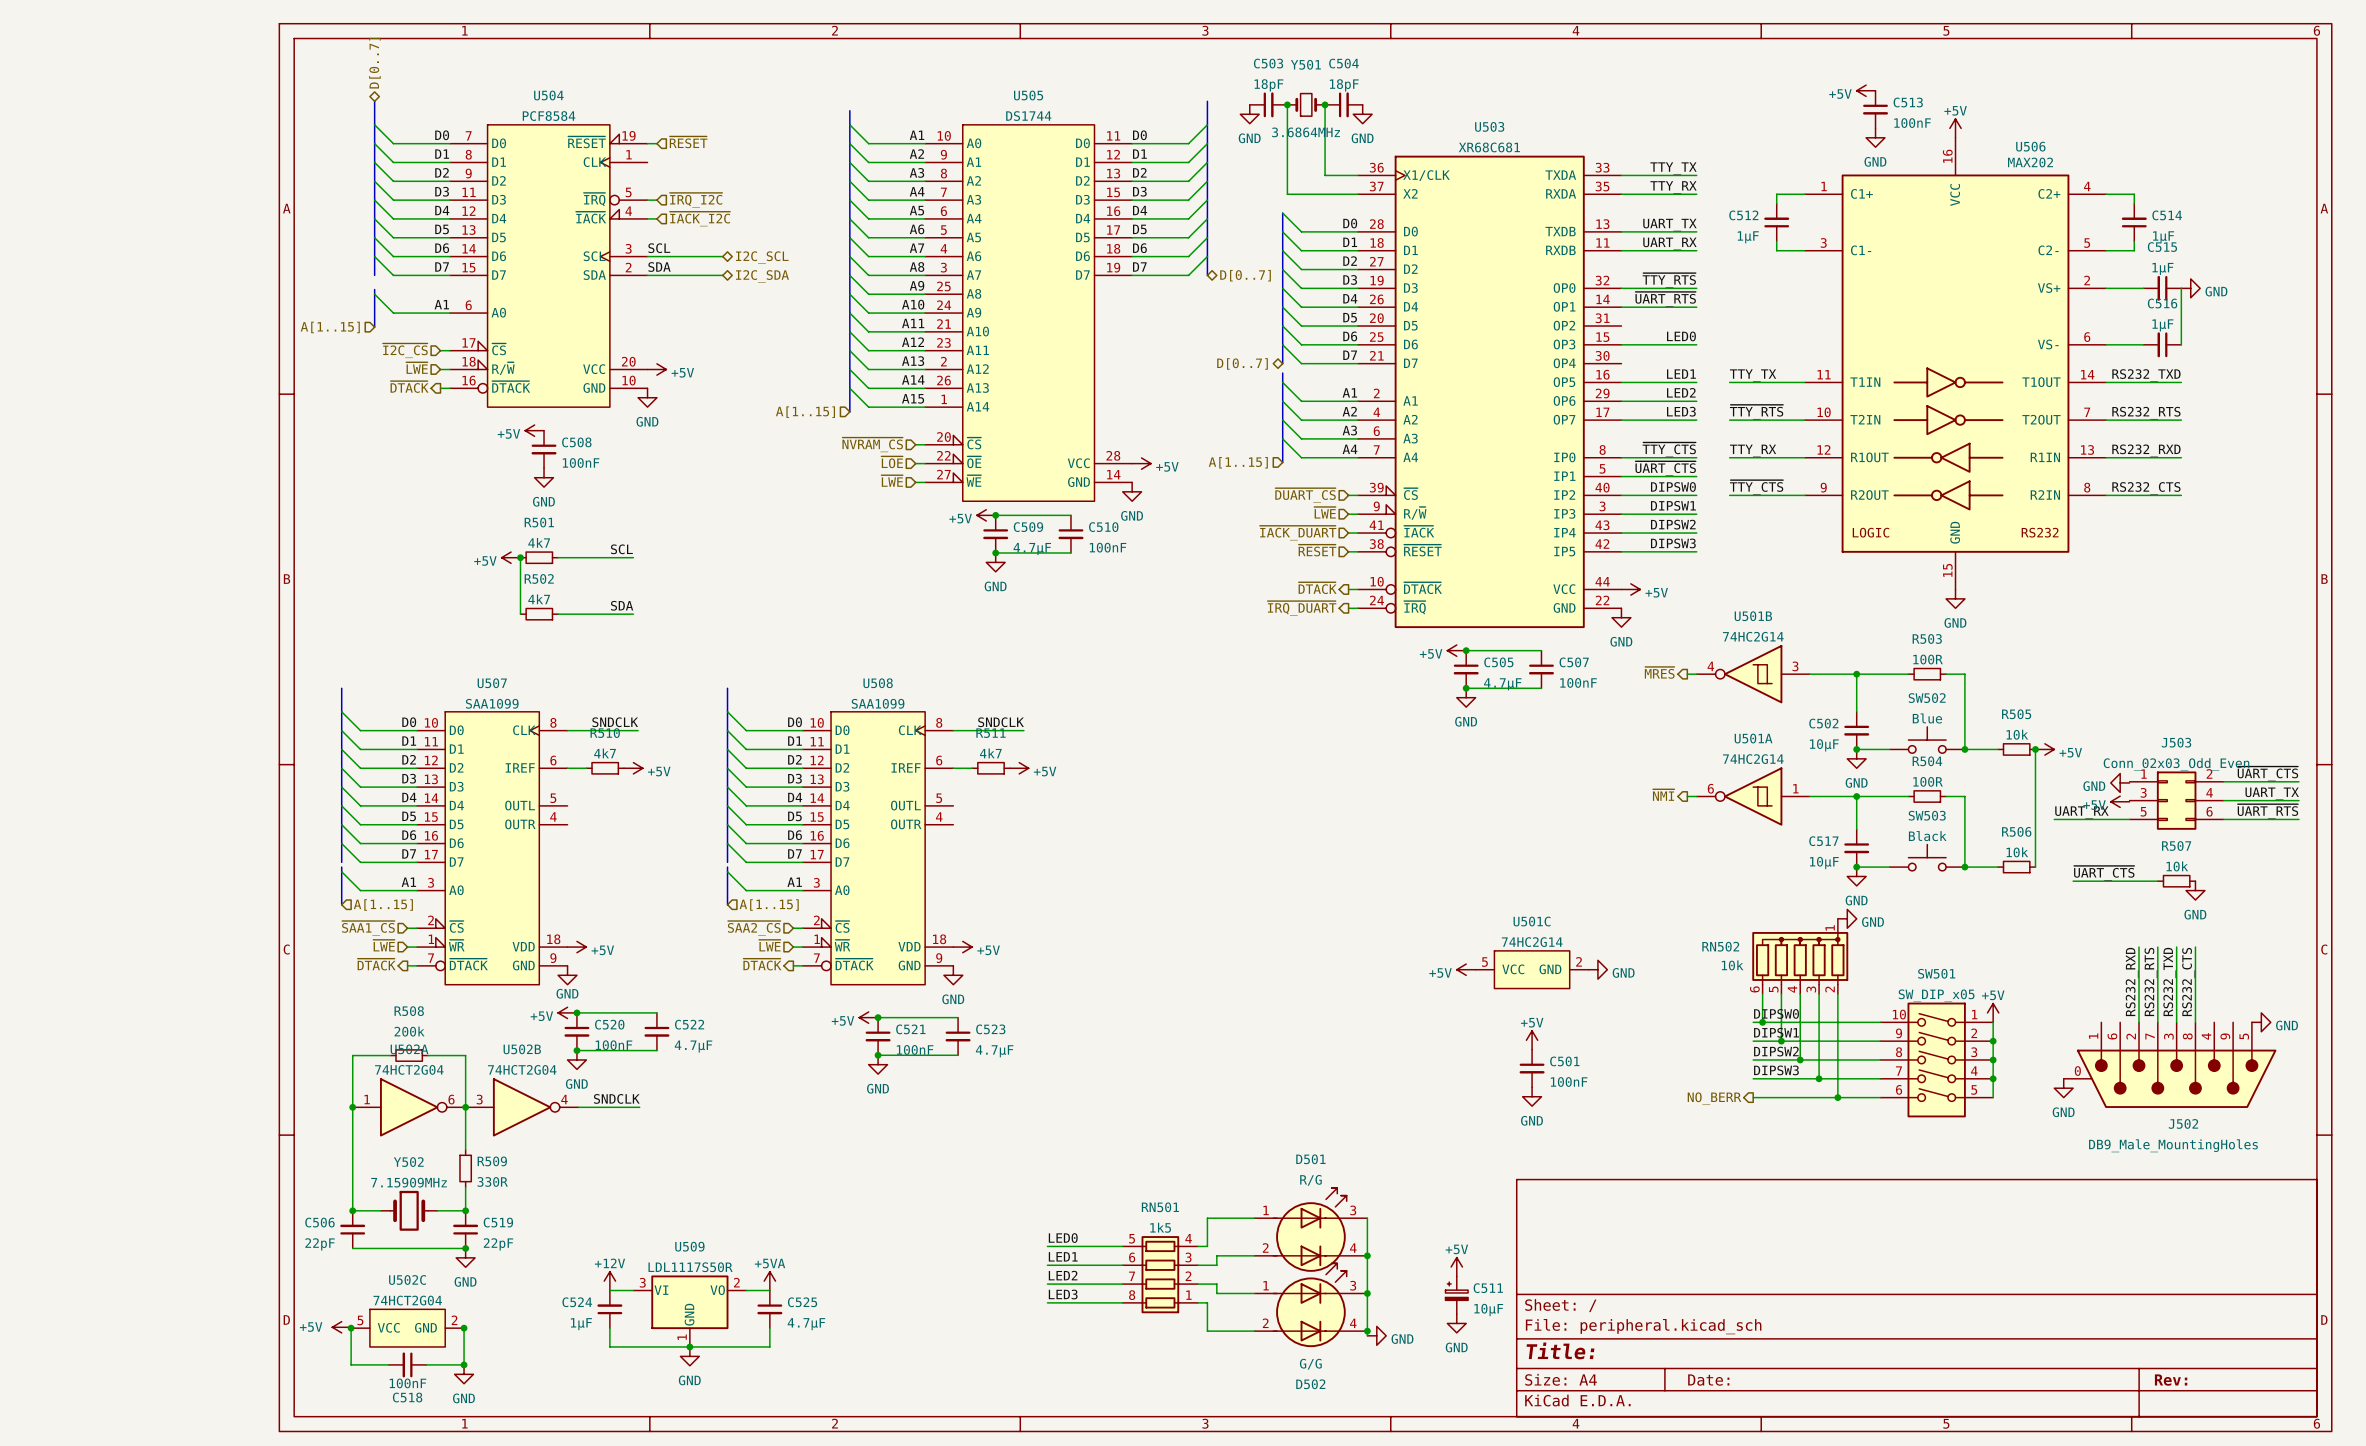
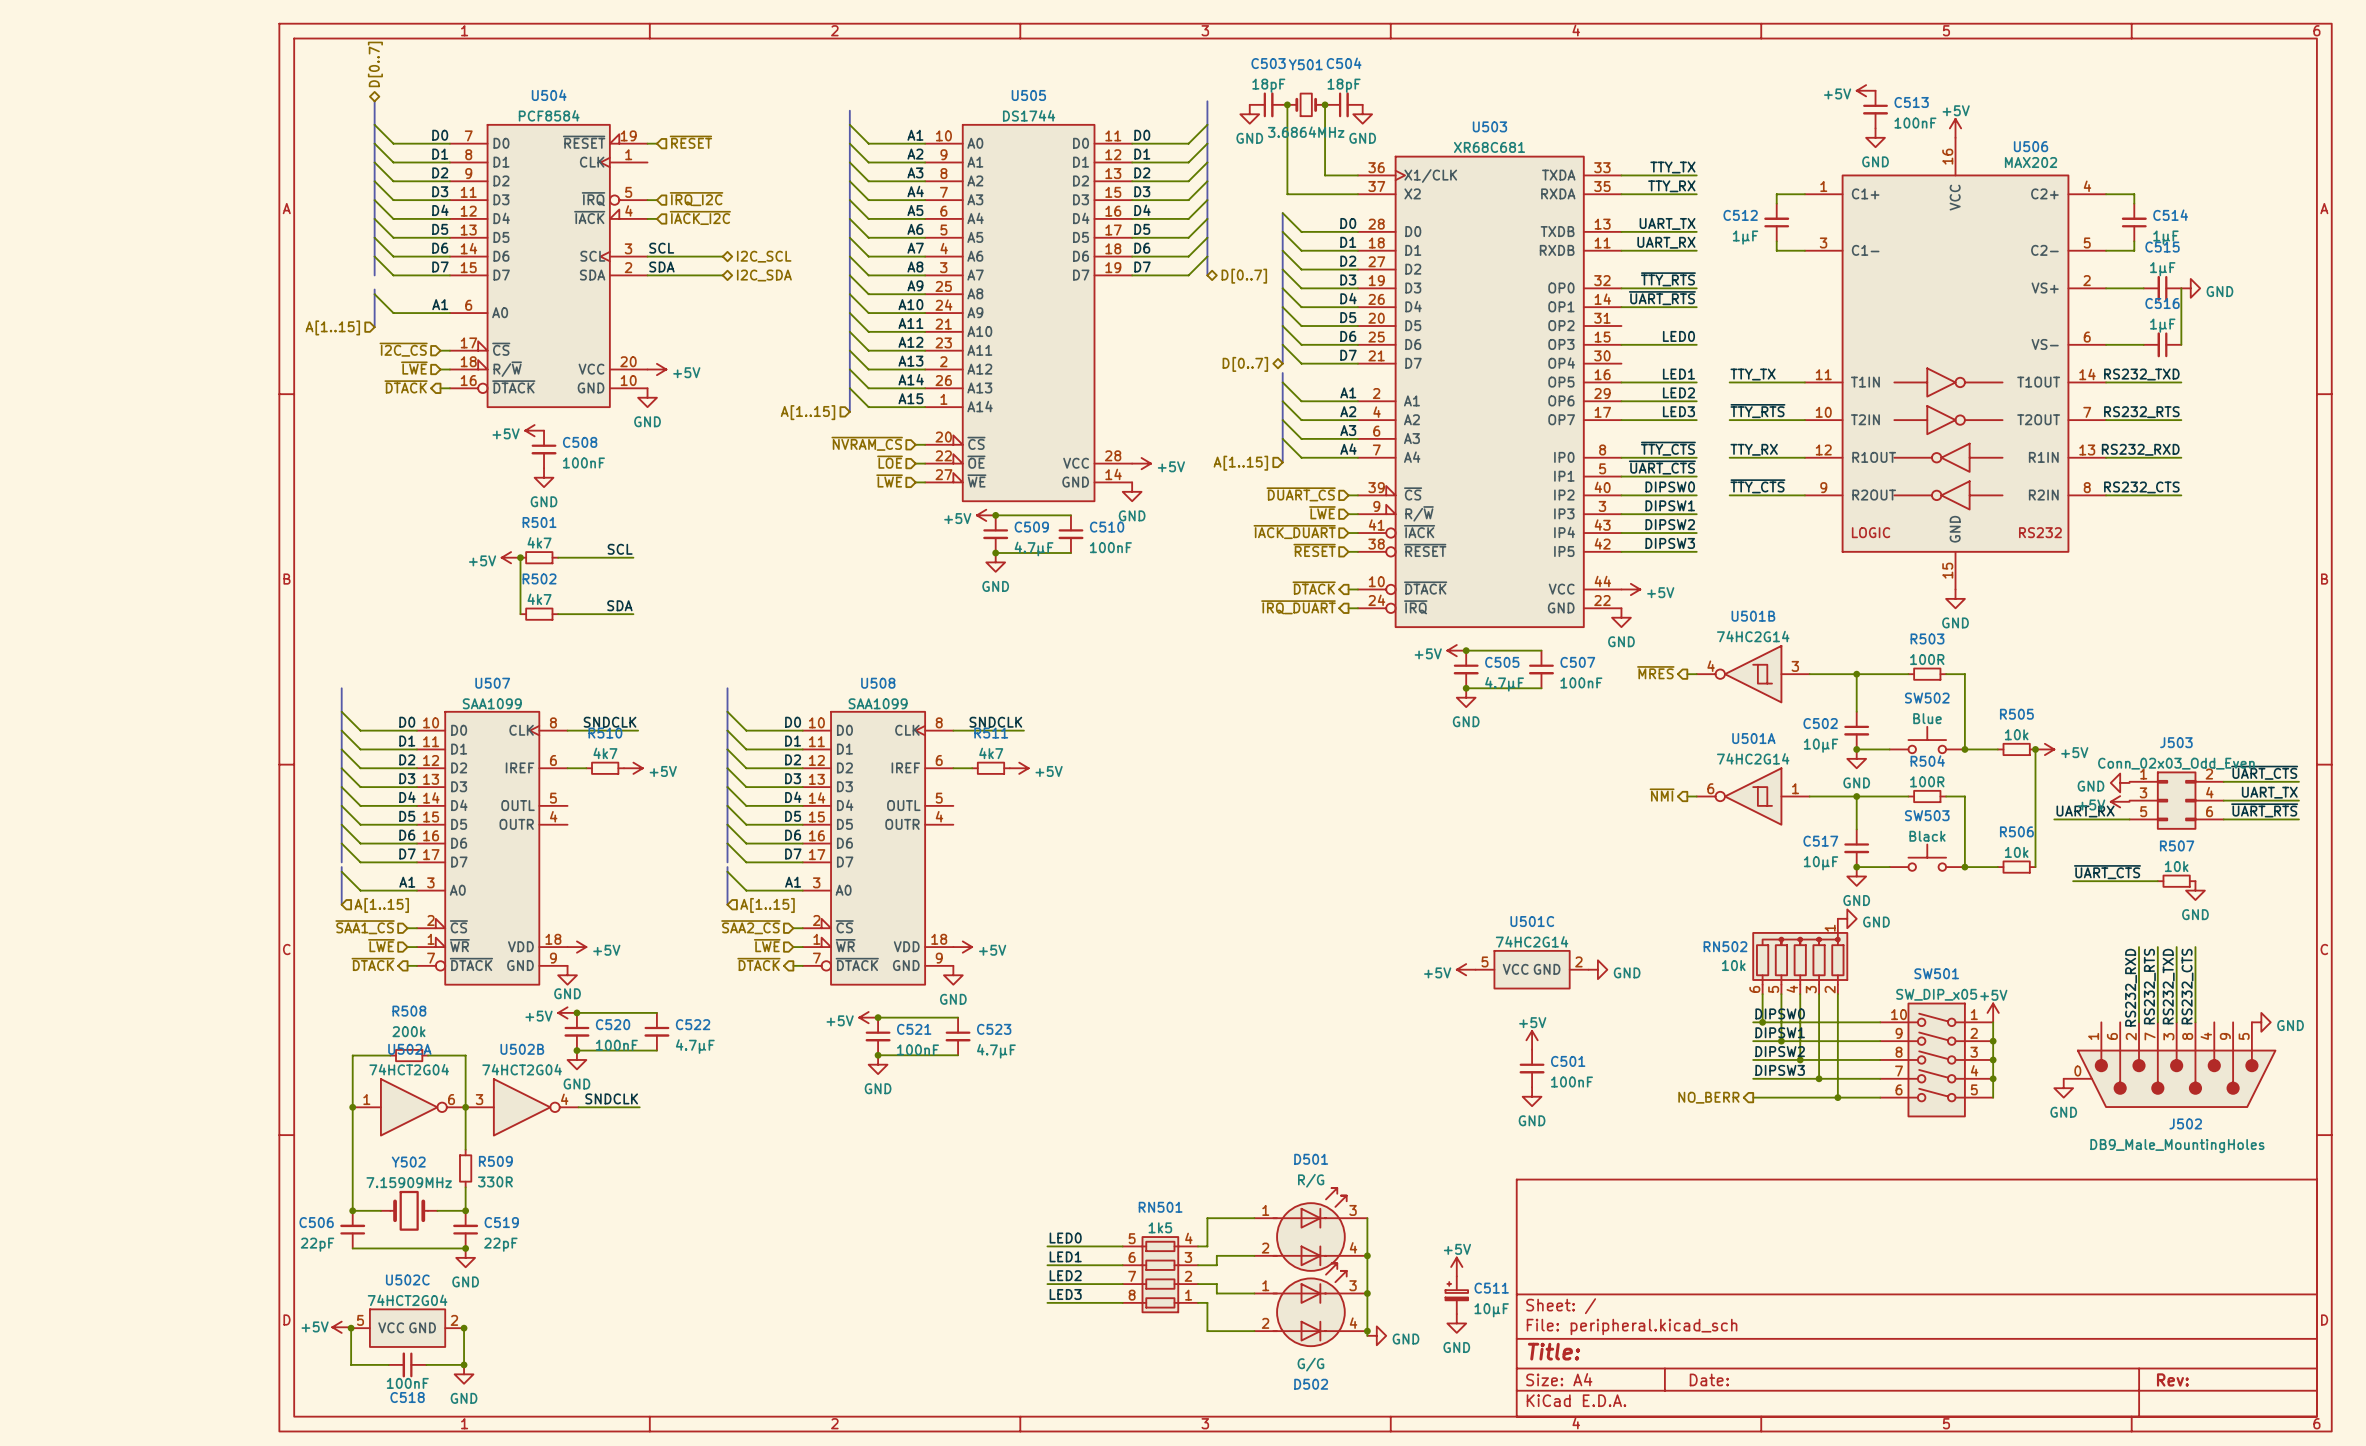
power symbol: +12V (609, 1281) -> none
power symbol: +5VA (769, 1281) -> none
wire: (609, 1290) (633, 1290) -> none
wire: (746, 1290) (769, 1290) -> none
C524: 1µF (609, 1309) -> none
C525: 4.7µF (769, 1309) -> none
U509: LDL1117S50R (689, 1311) -> none
wire: (609, 1328) (609, 1346) (769, 1346) (769, 1328) -> none
junction: (689, 1346) -> none
power symbol: GND (689, 1356) -> none

